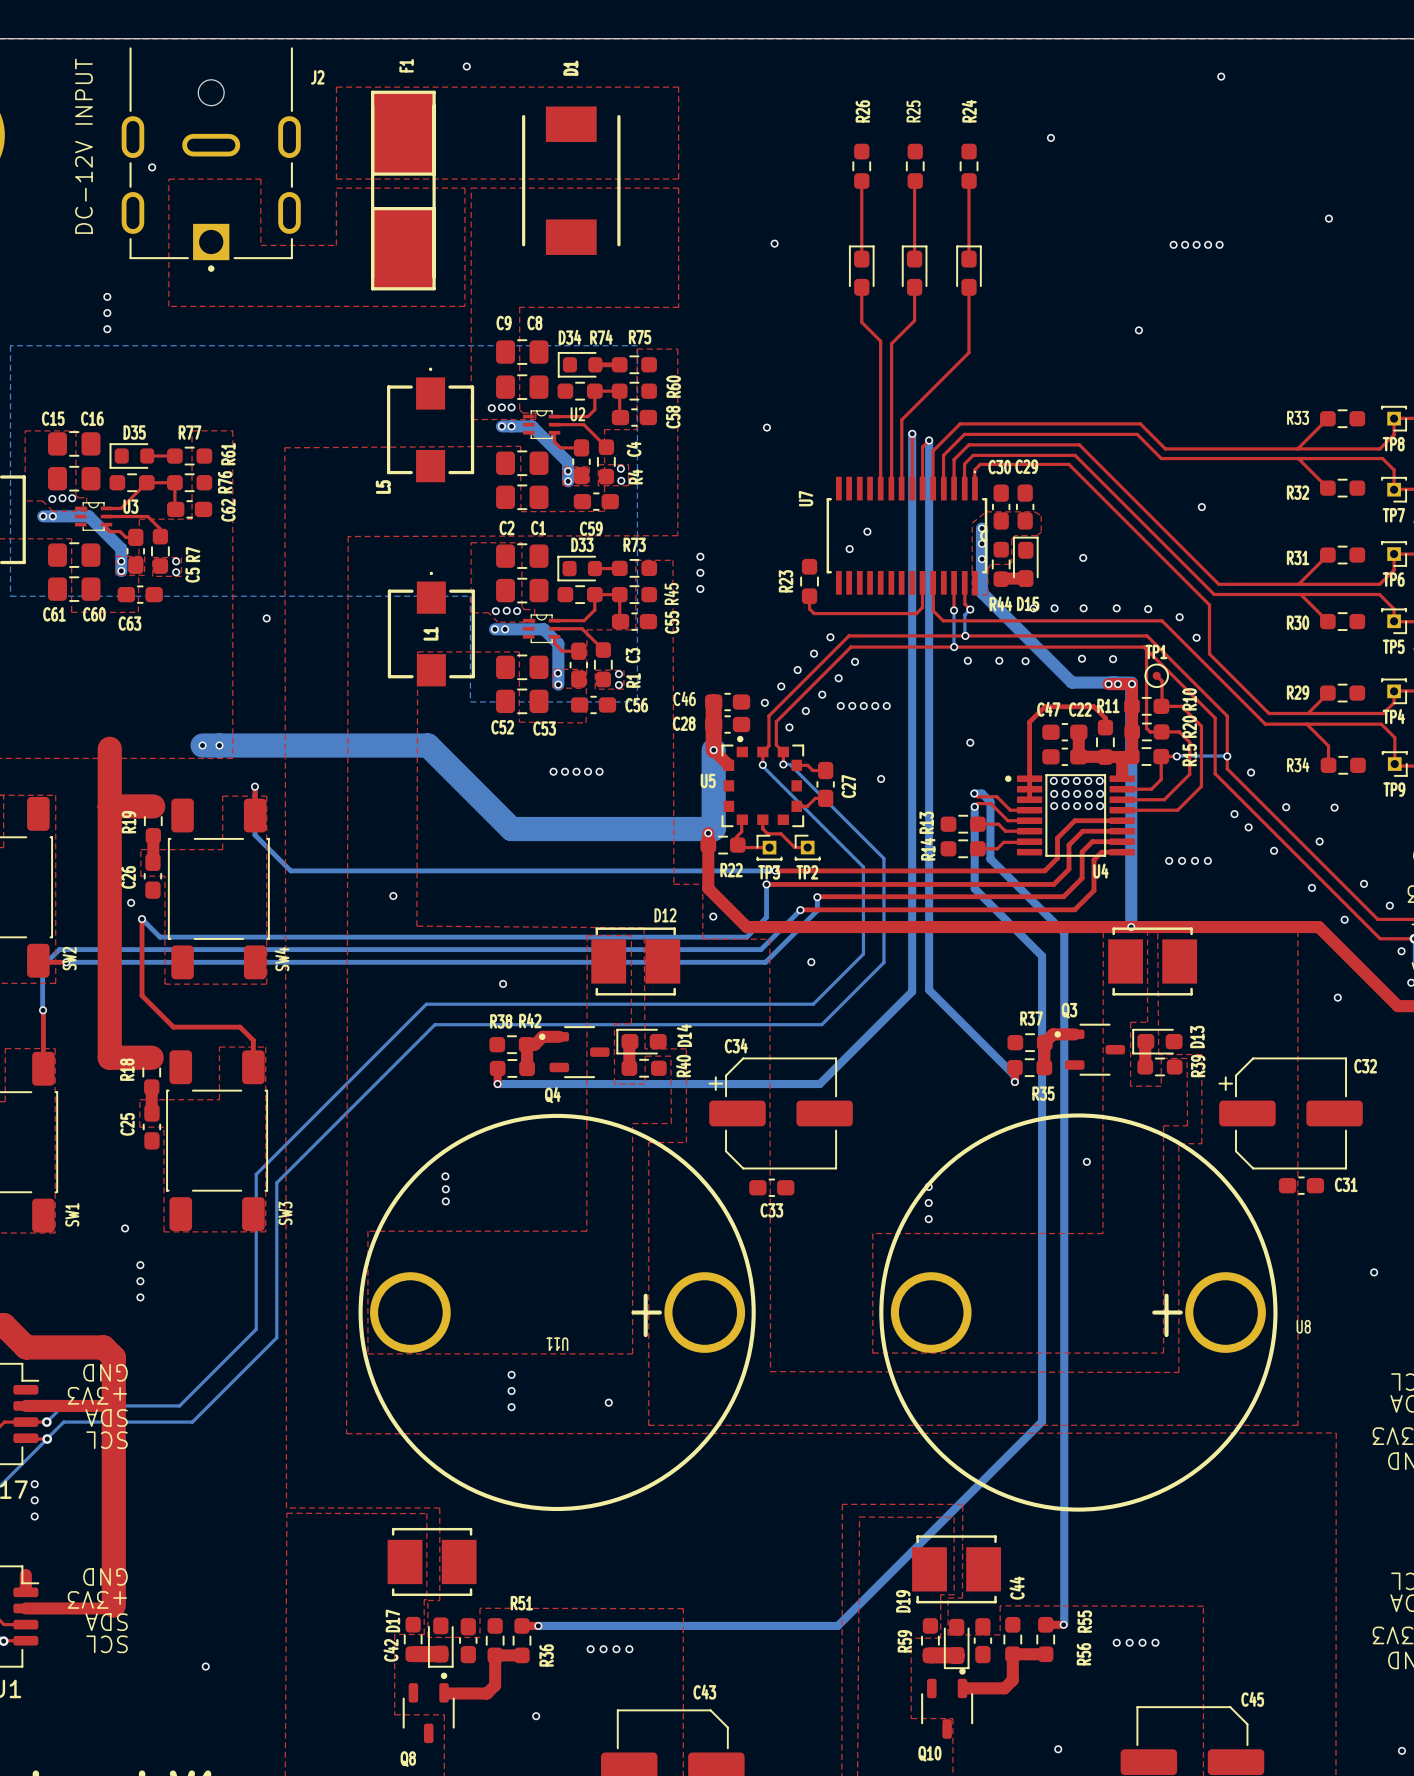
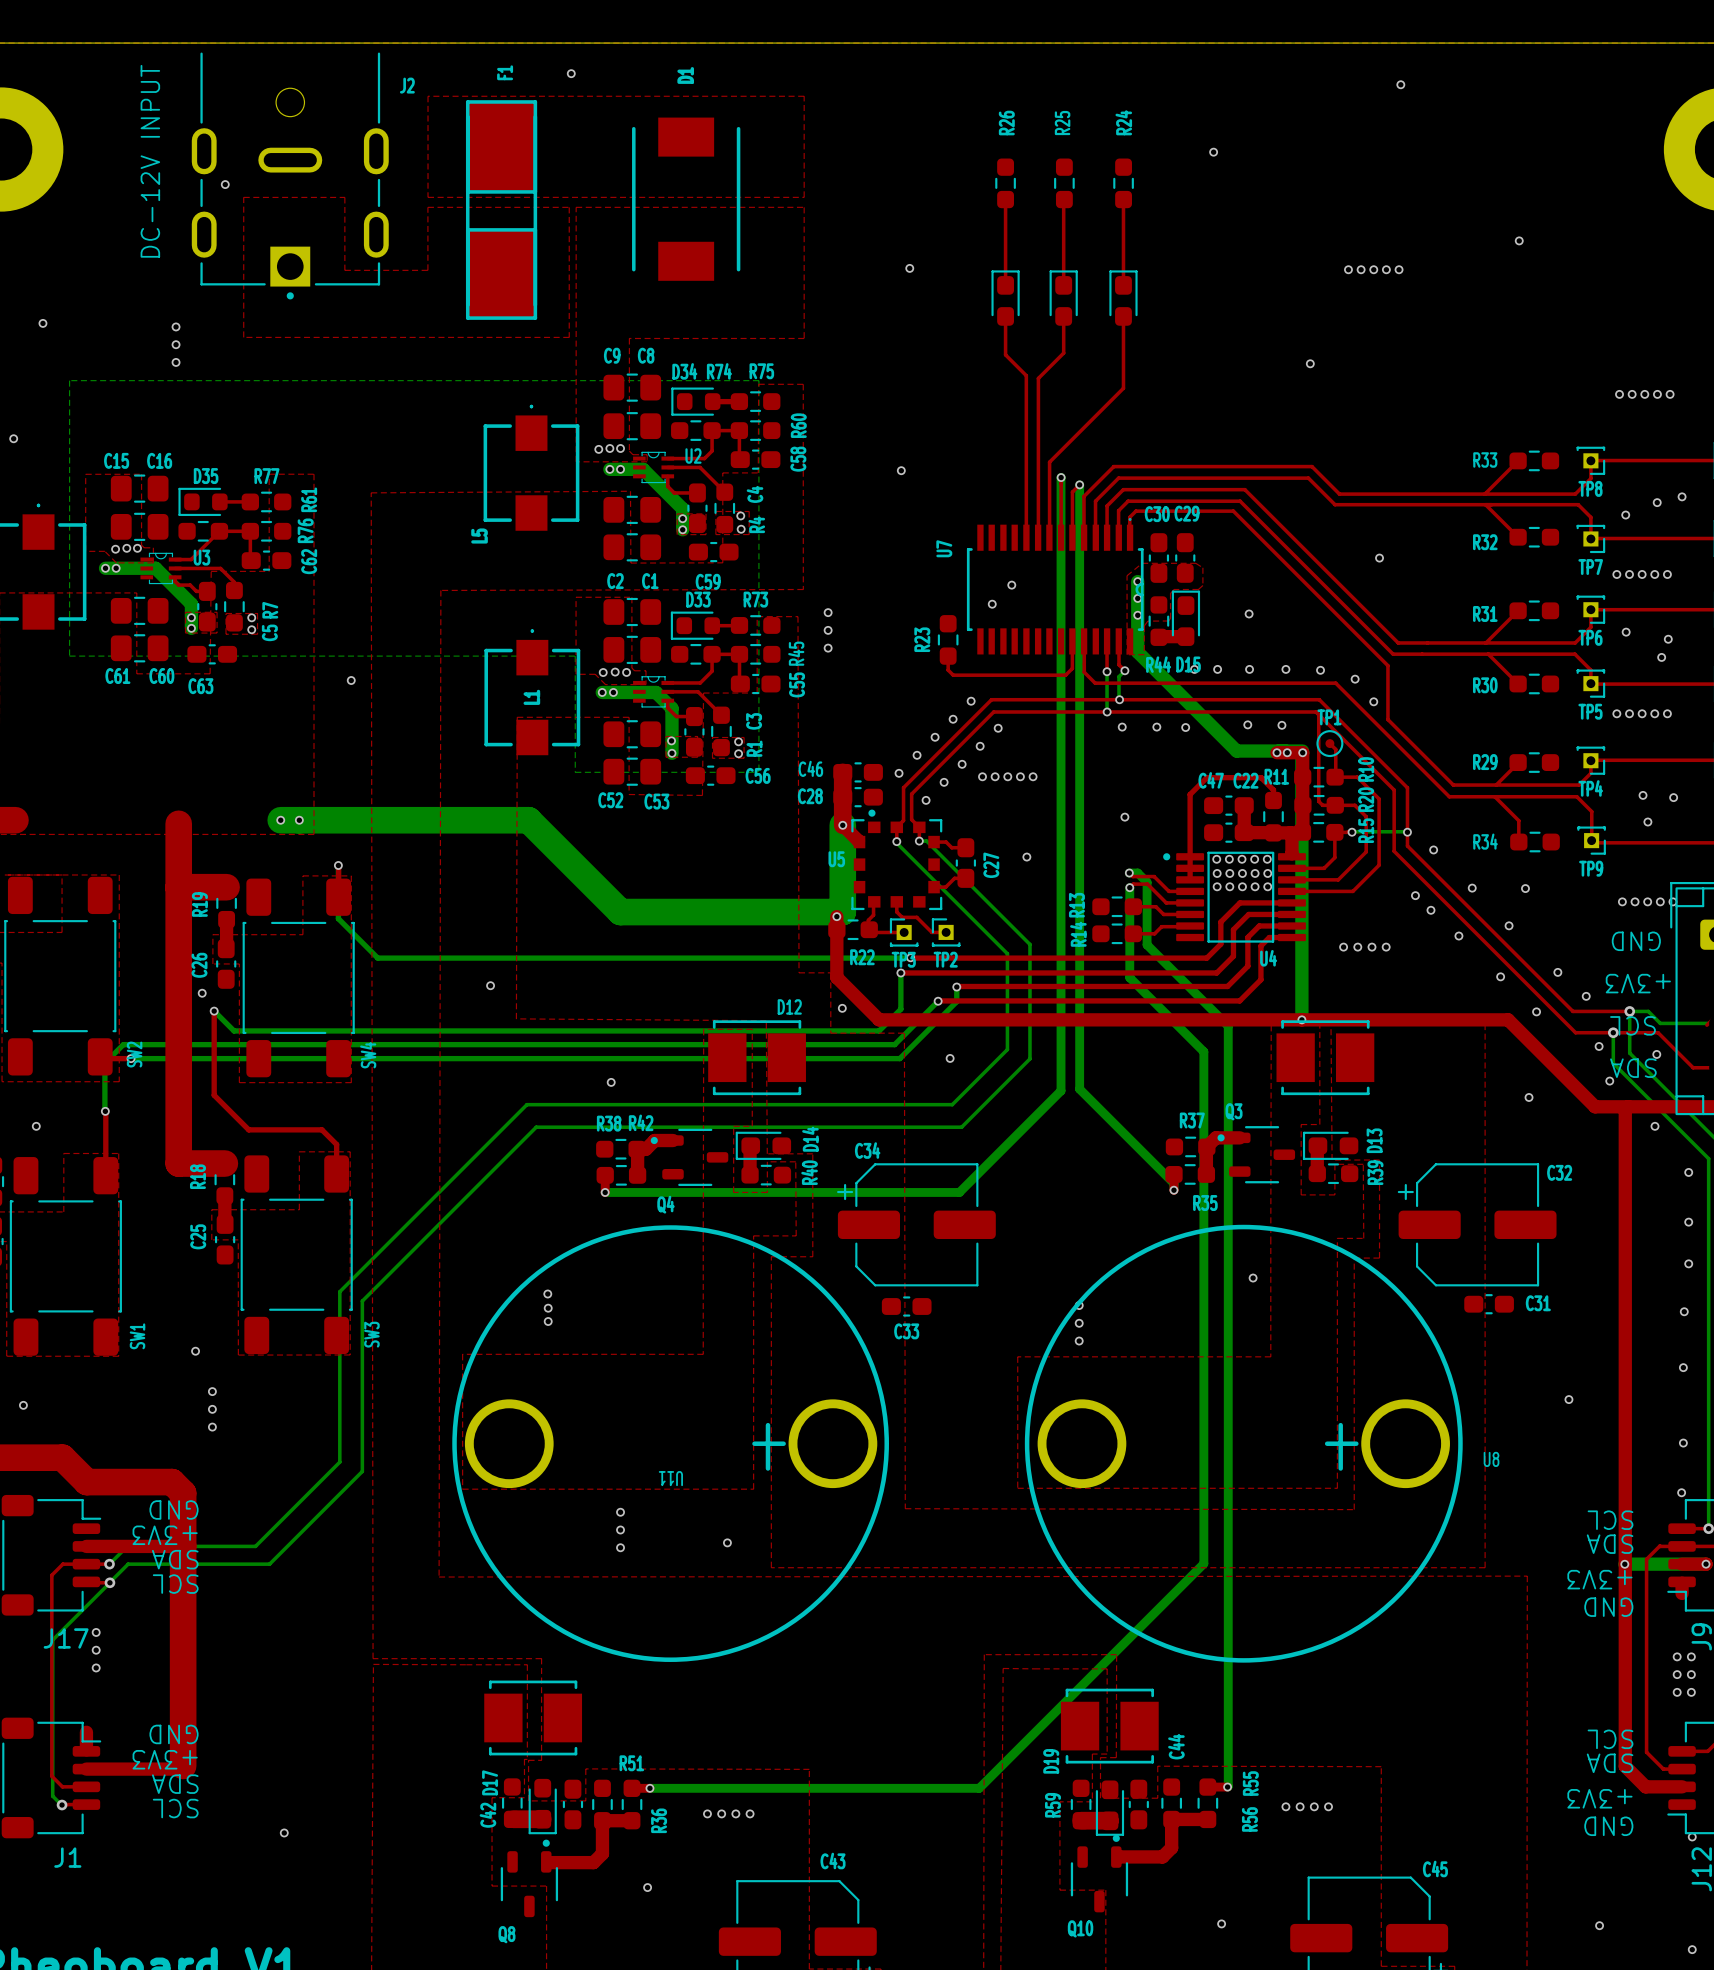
via: (553, 771) -> none
via: (565, 771) -> none
via: (576, 771) -> none
via: (588, 771) -> none
via: (599, 771) -> none

